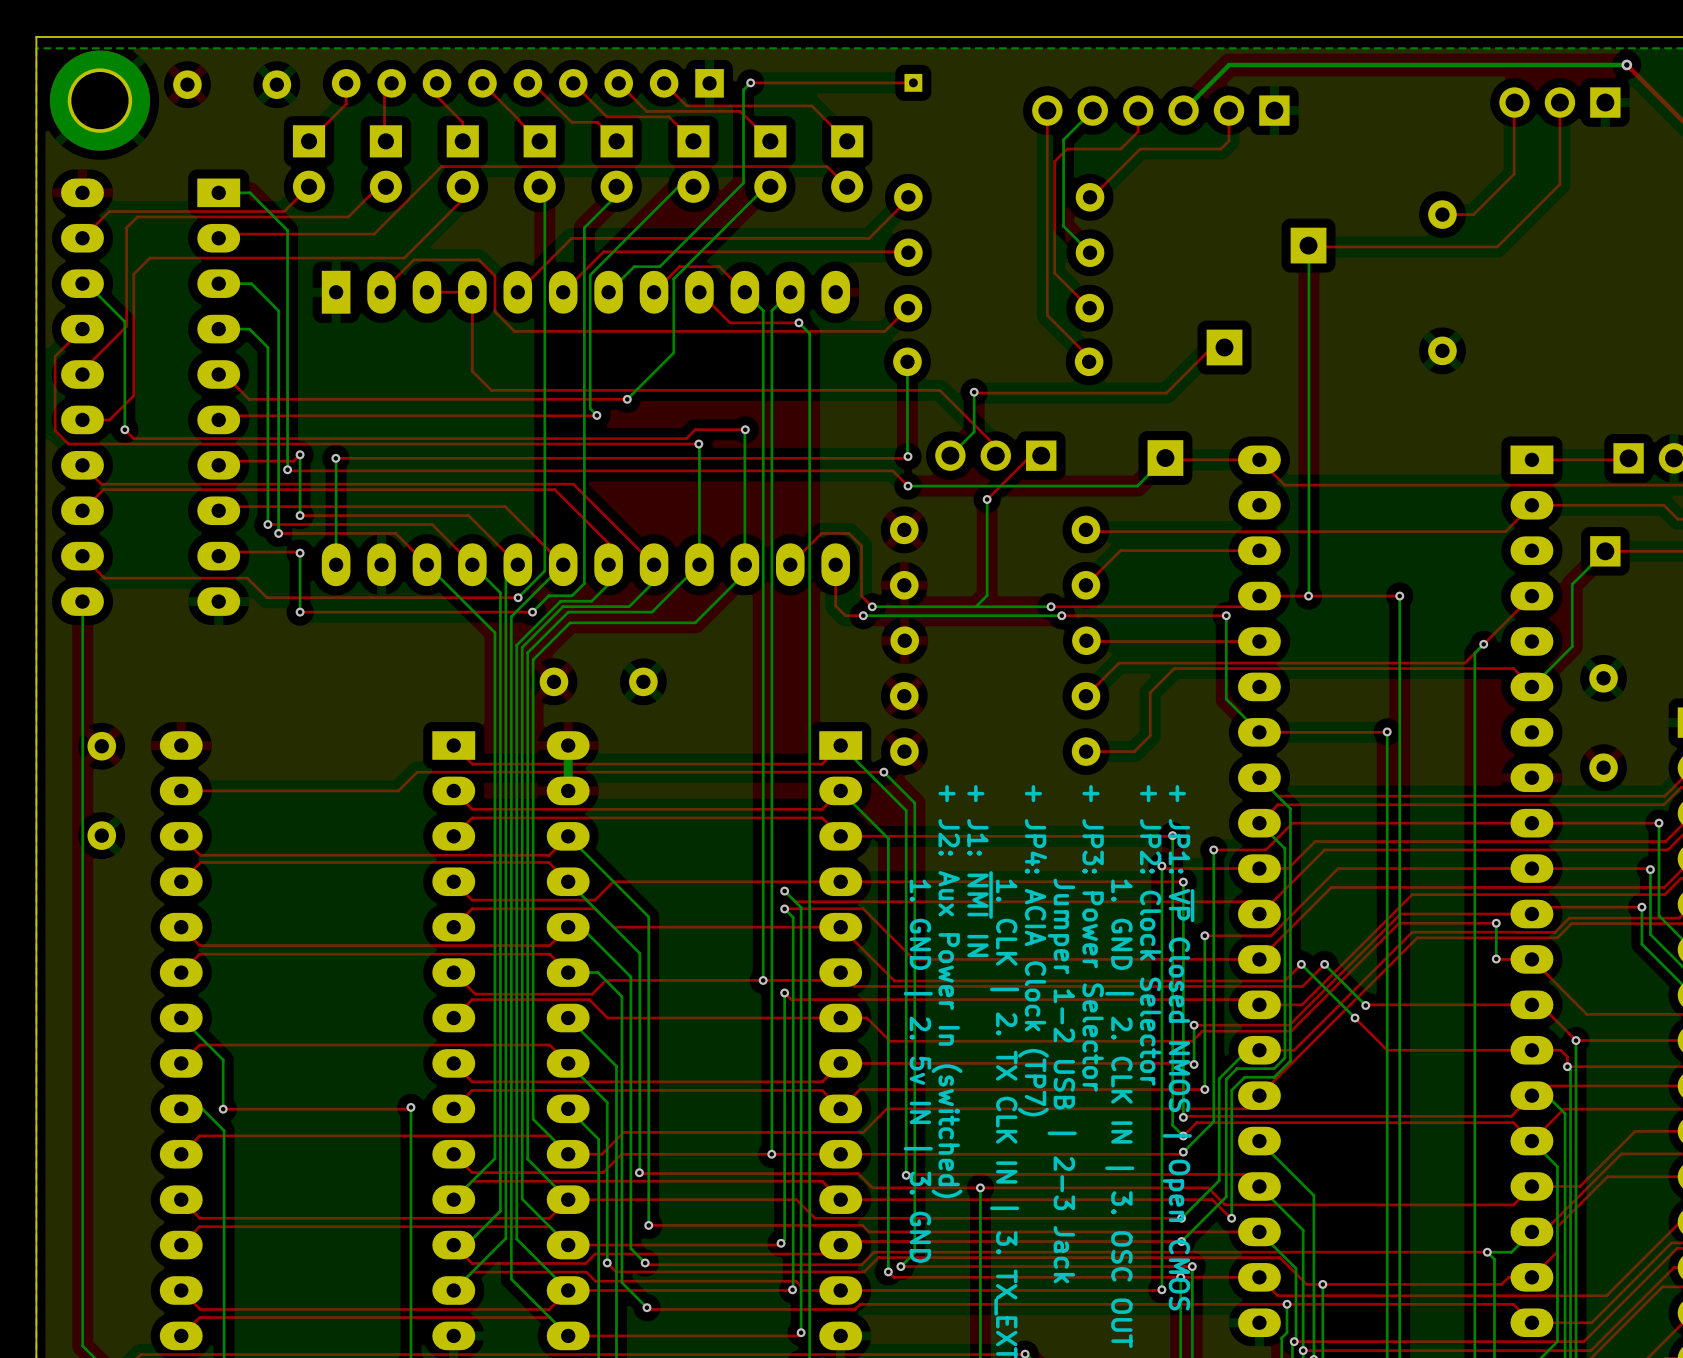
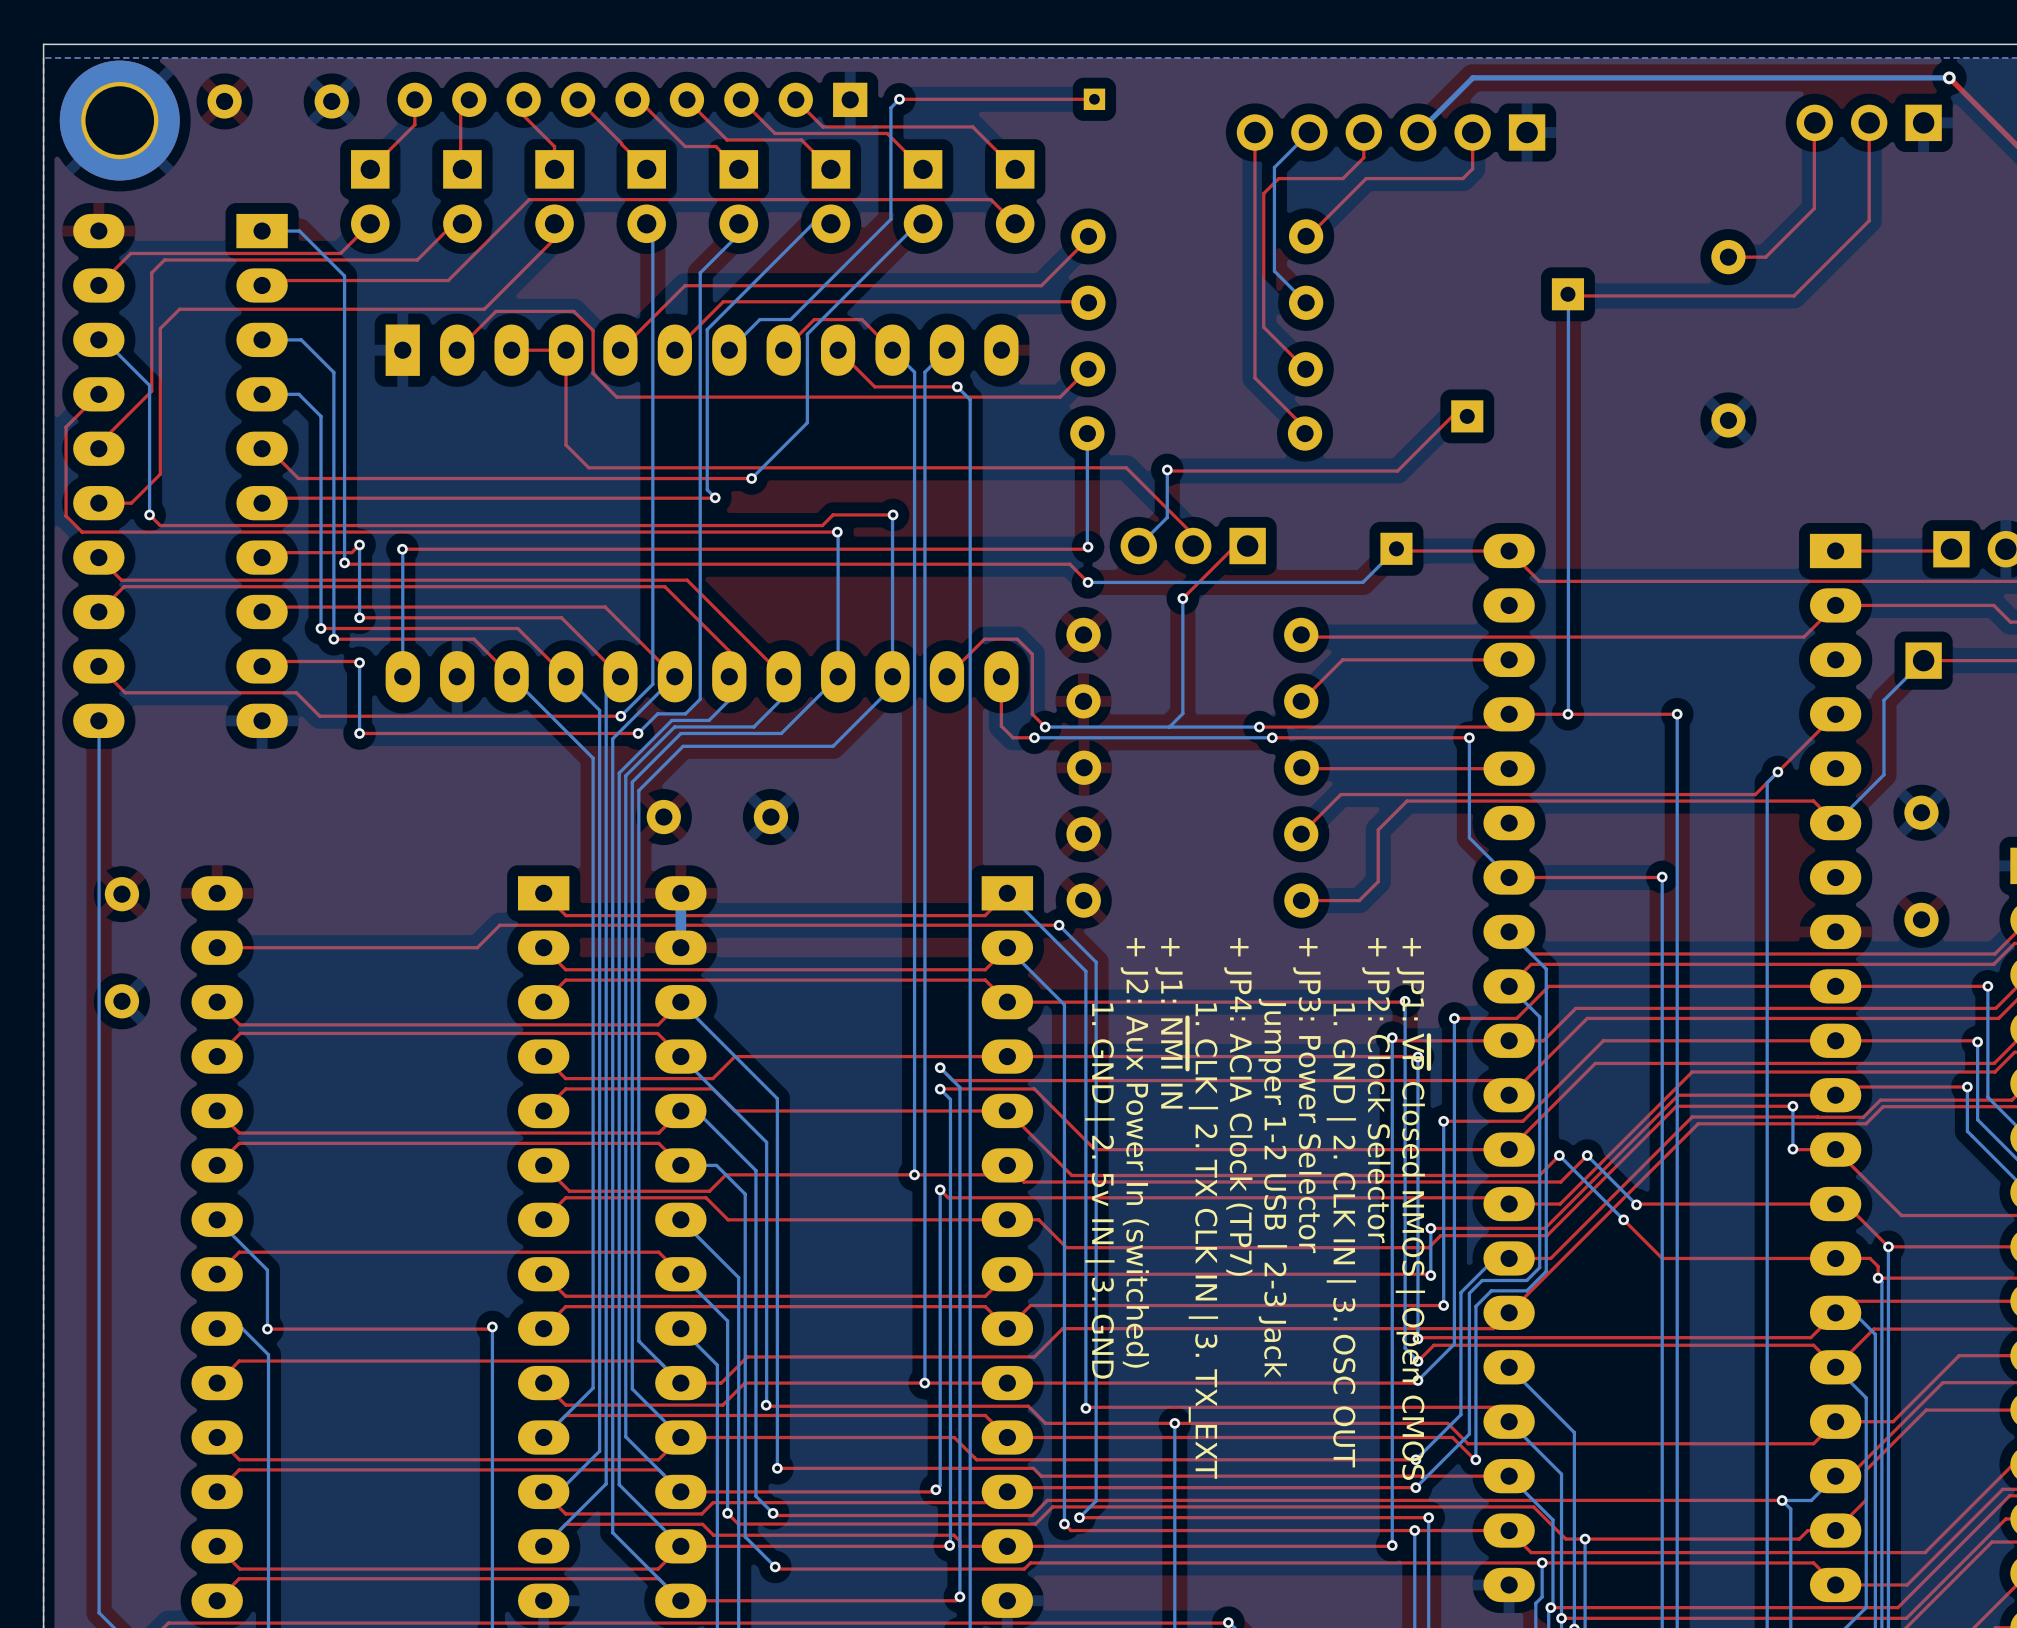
part footprint: [1290, 227, 1327, 264] -> [1551, 278, 1585, 311]
part footprint: [1206, 329, 1243, 366] -> [1451, 400, 1484, 433]
part footprint: [1147, 440, 1184, 476] -> [1380, 532, 1413, 565]

